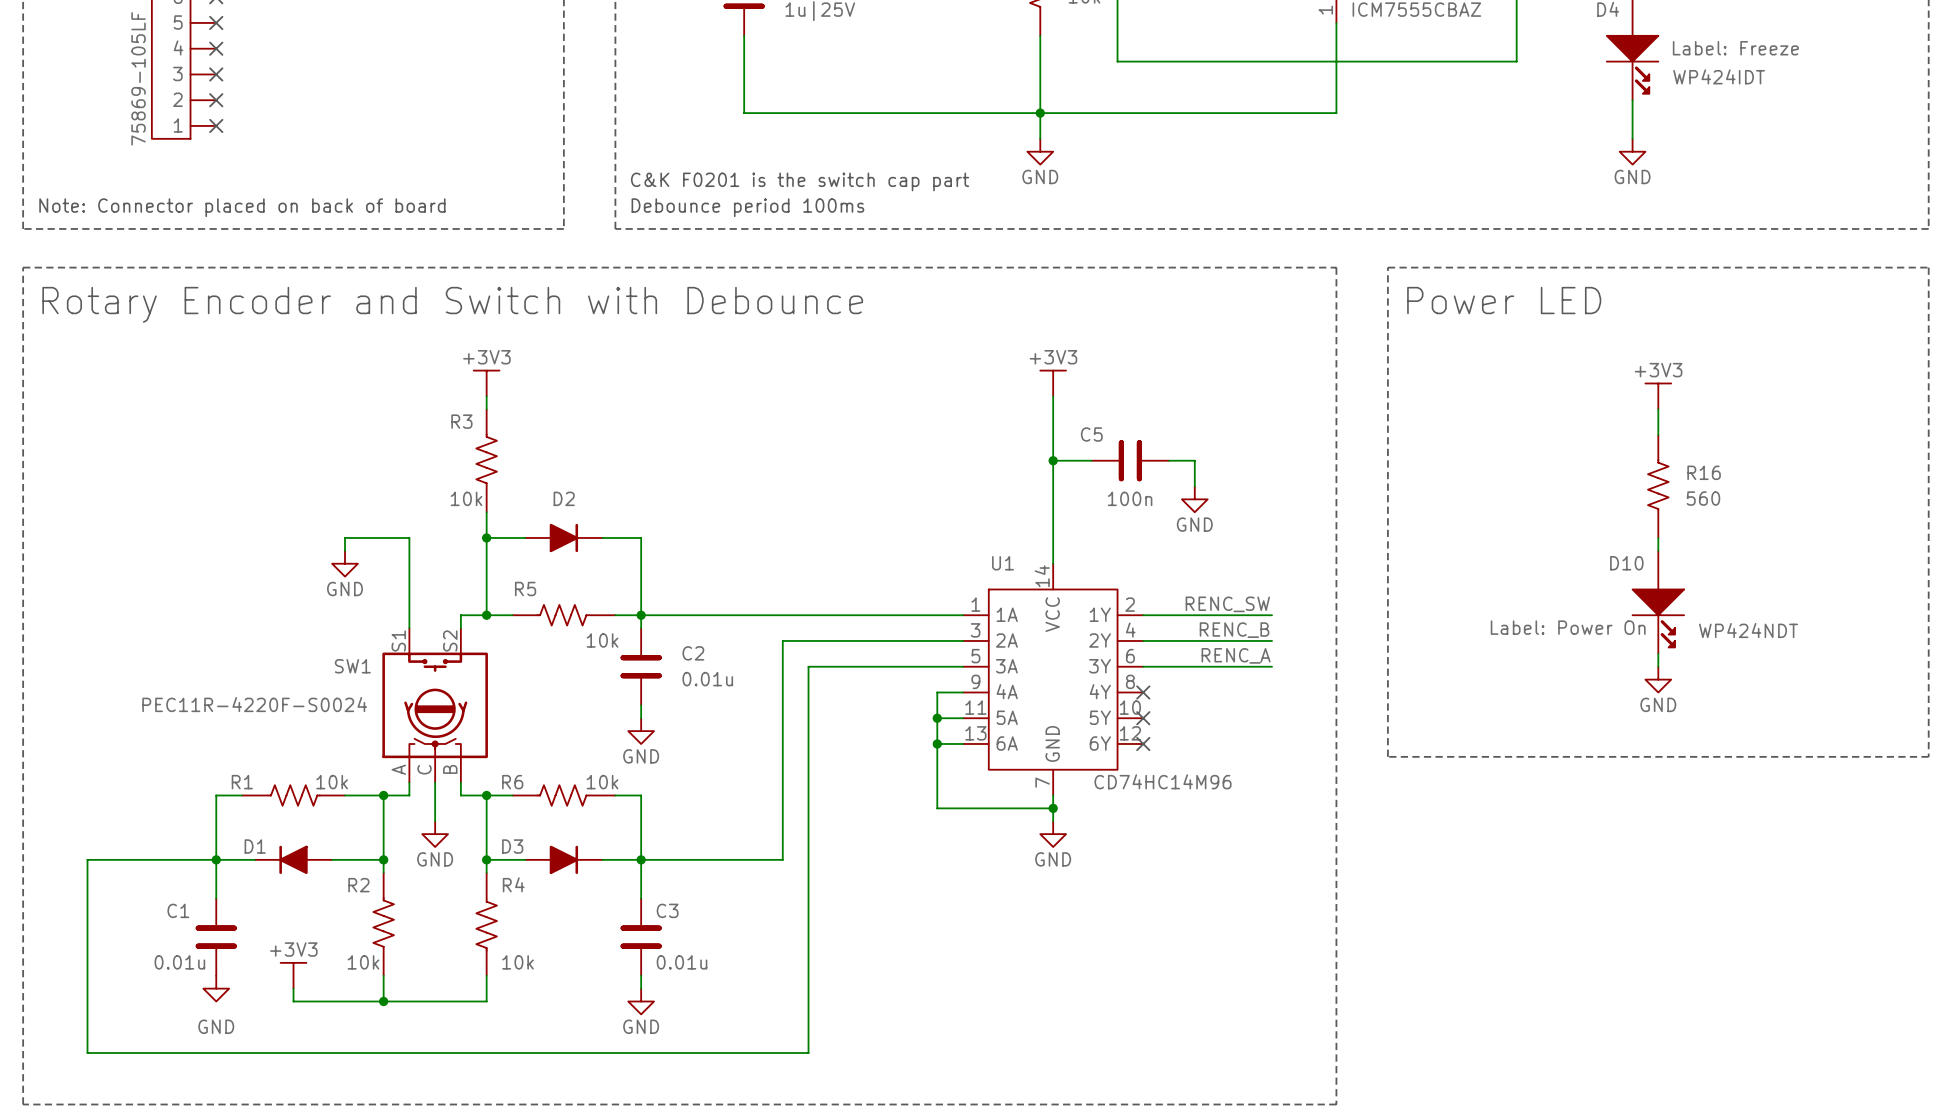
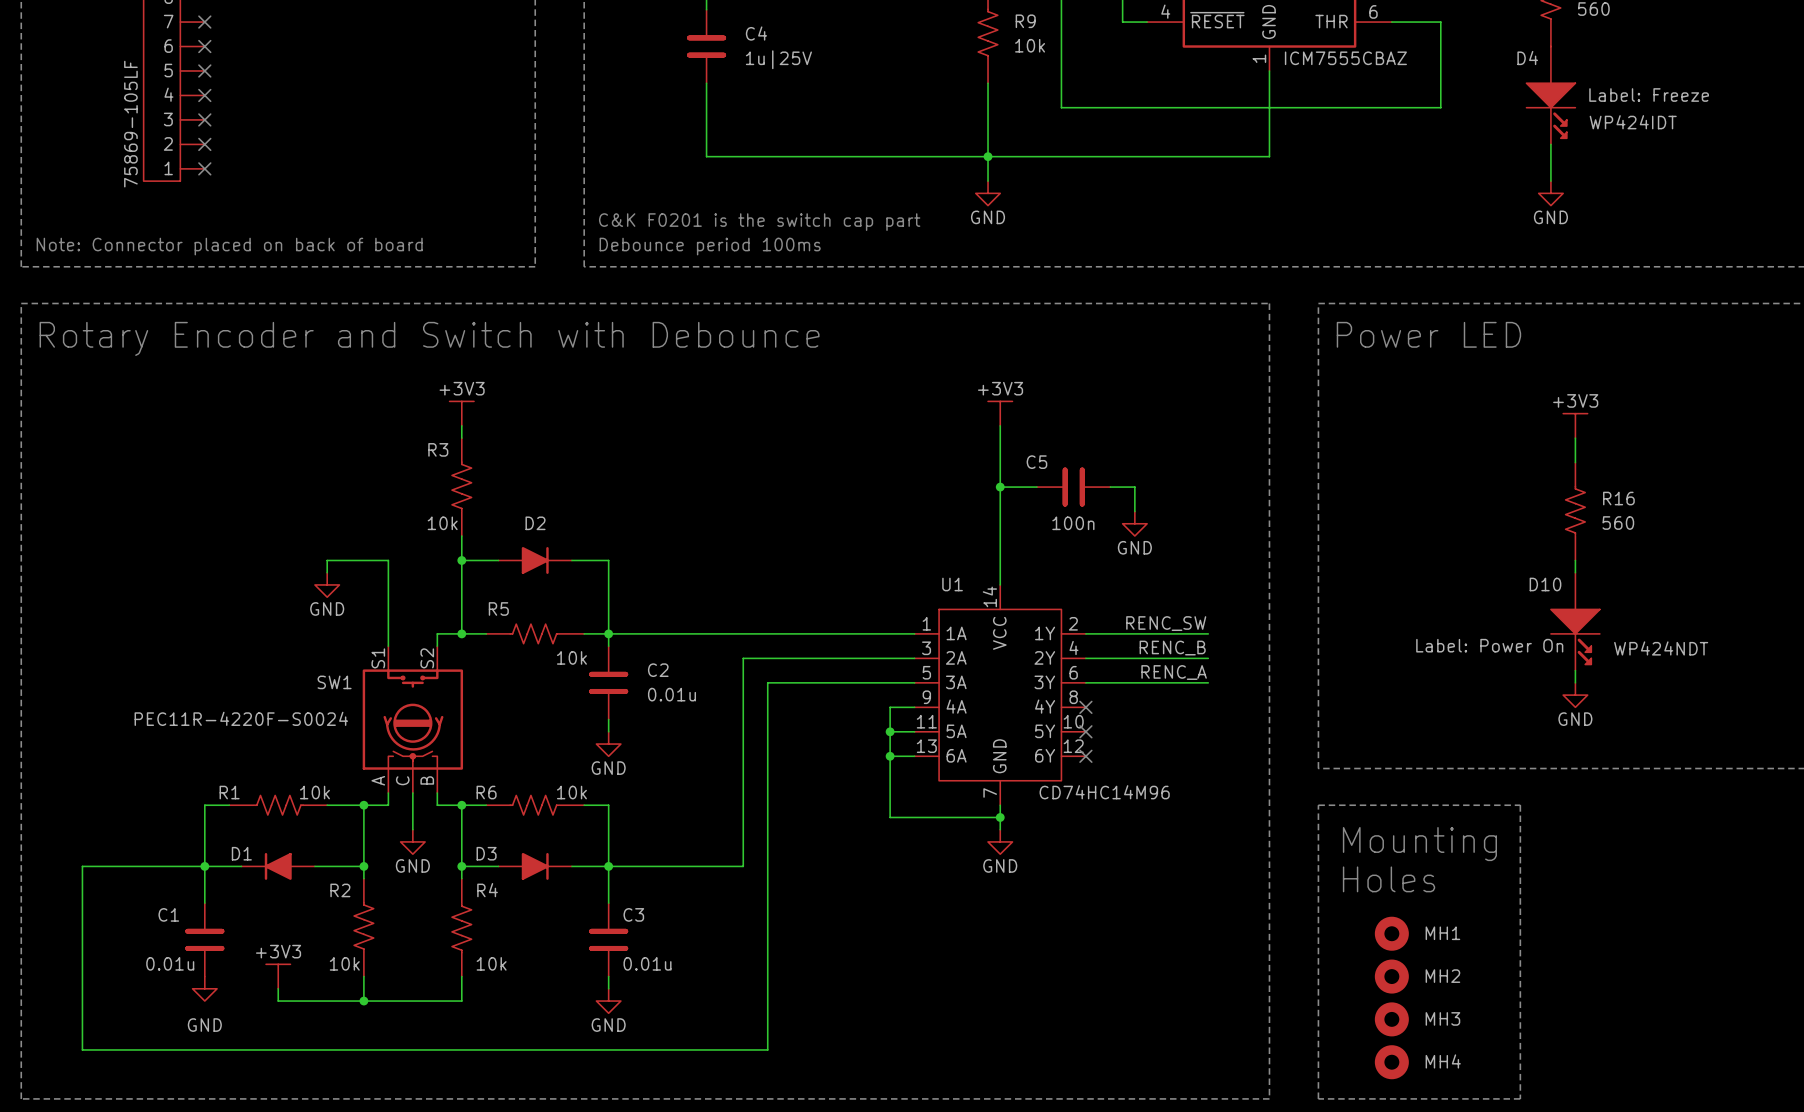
line: none -> (1318, 805) (1520, 805) (1520, 1098) (1318, 1098) (1318, 805)
text: none -> Mounting (1419, 844)
text: none -> Holes (1389, 879)
MH1: none -> (1391, 933)
MH2: none -> (1391, 976)
MH3: none -> (1391, 1019)
MH4: none -> (1391, 1062)

